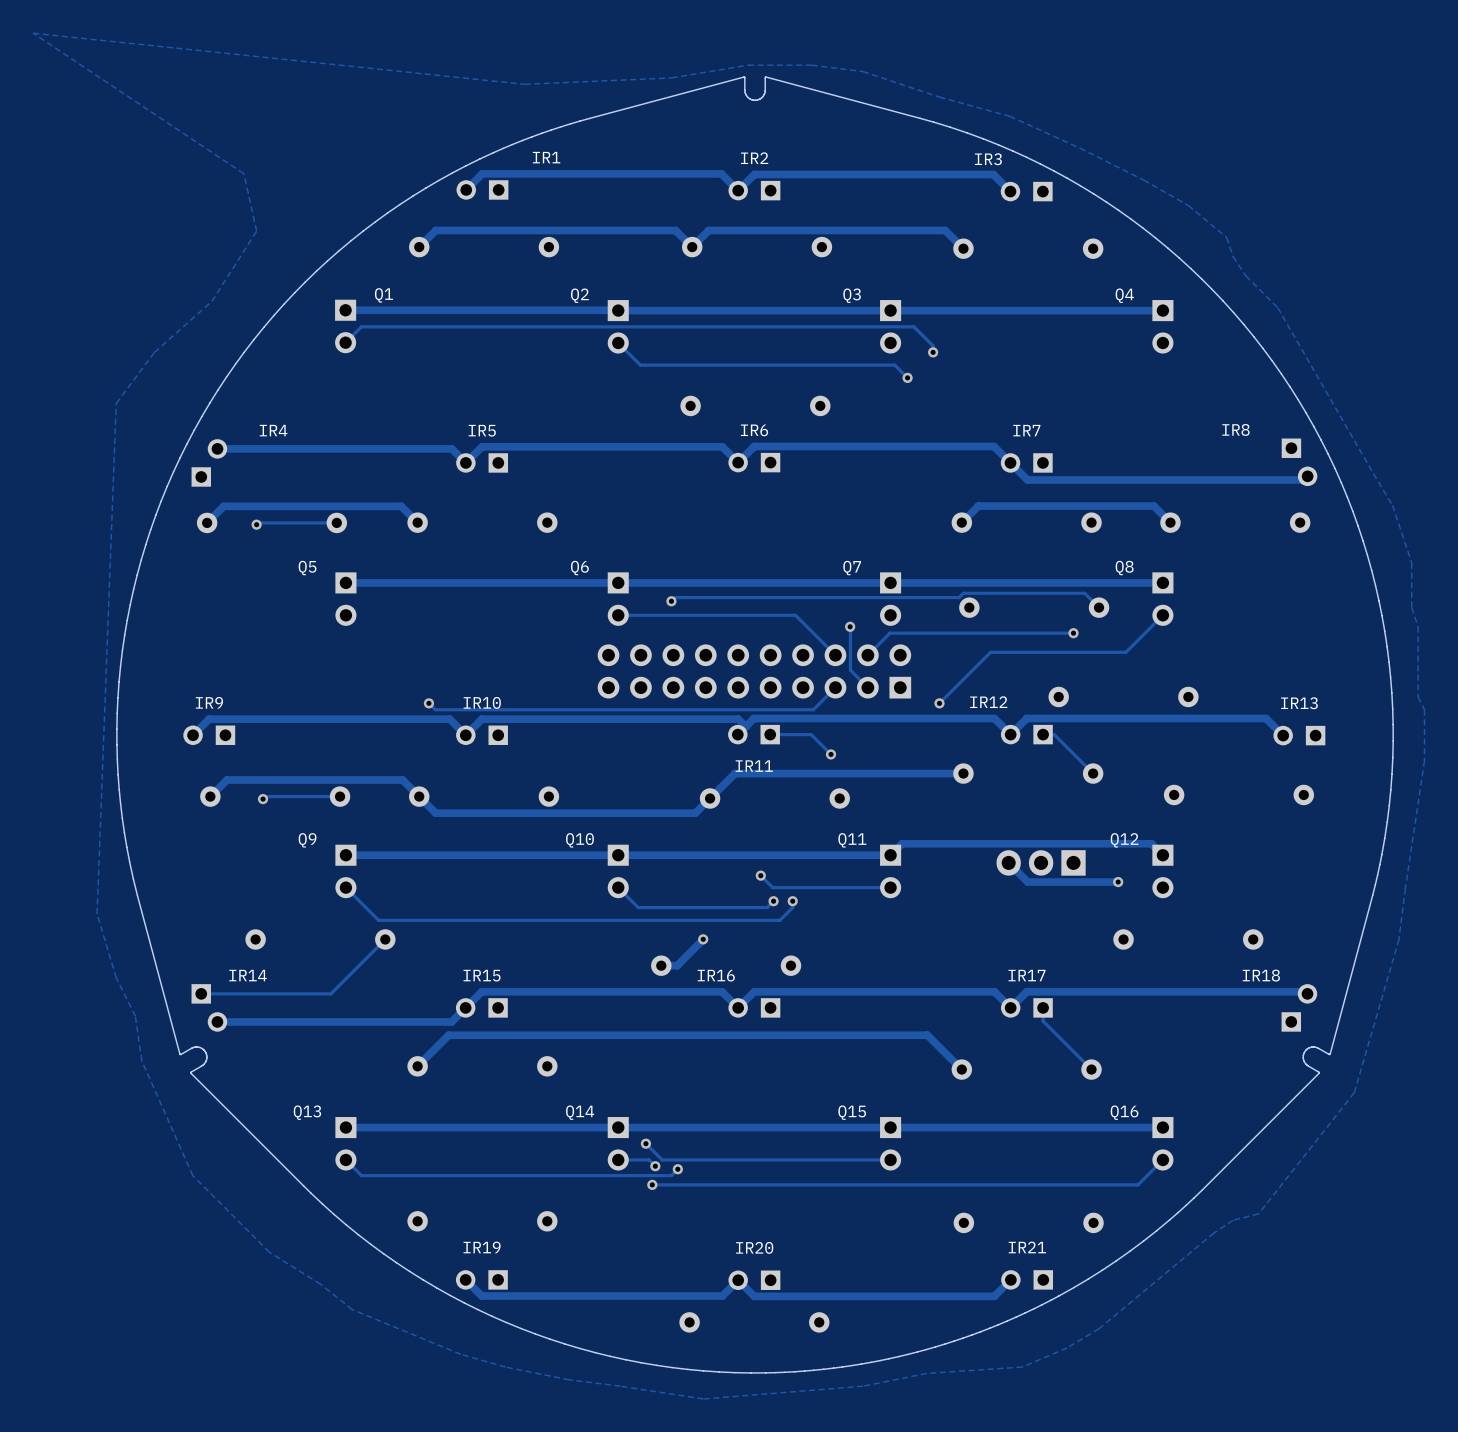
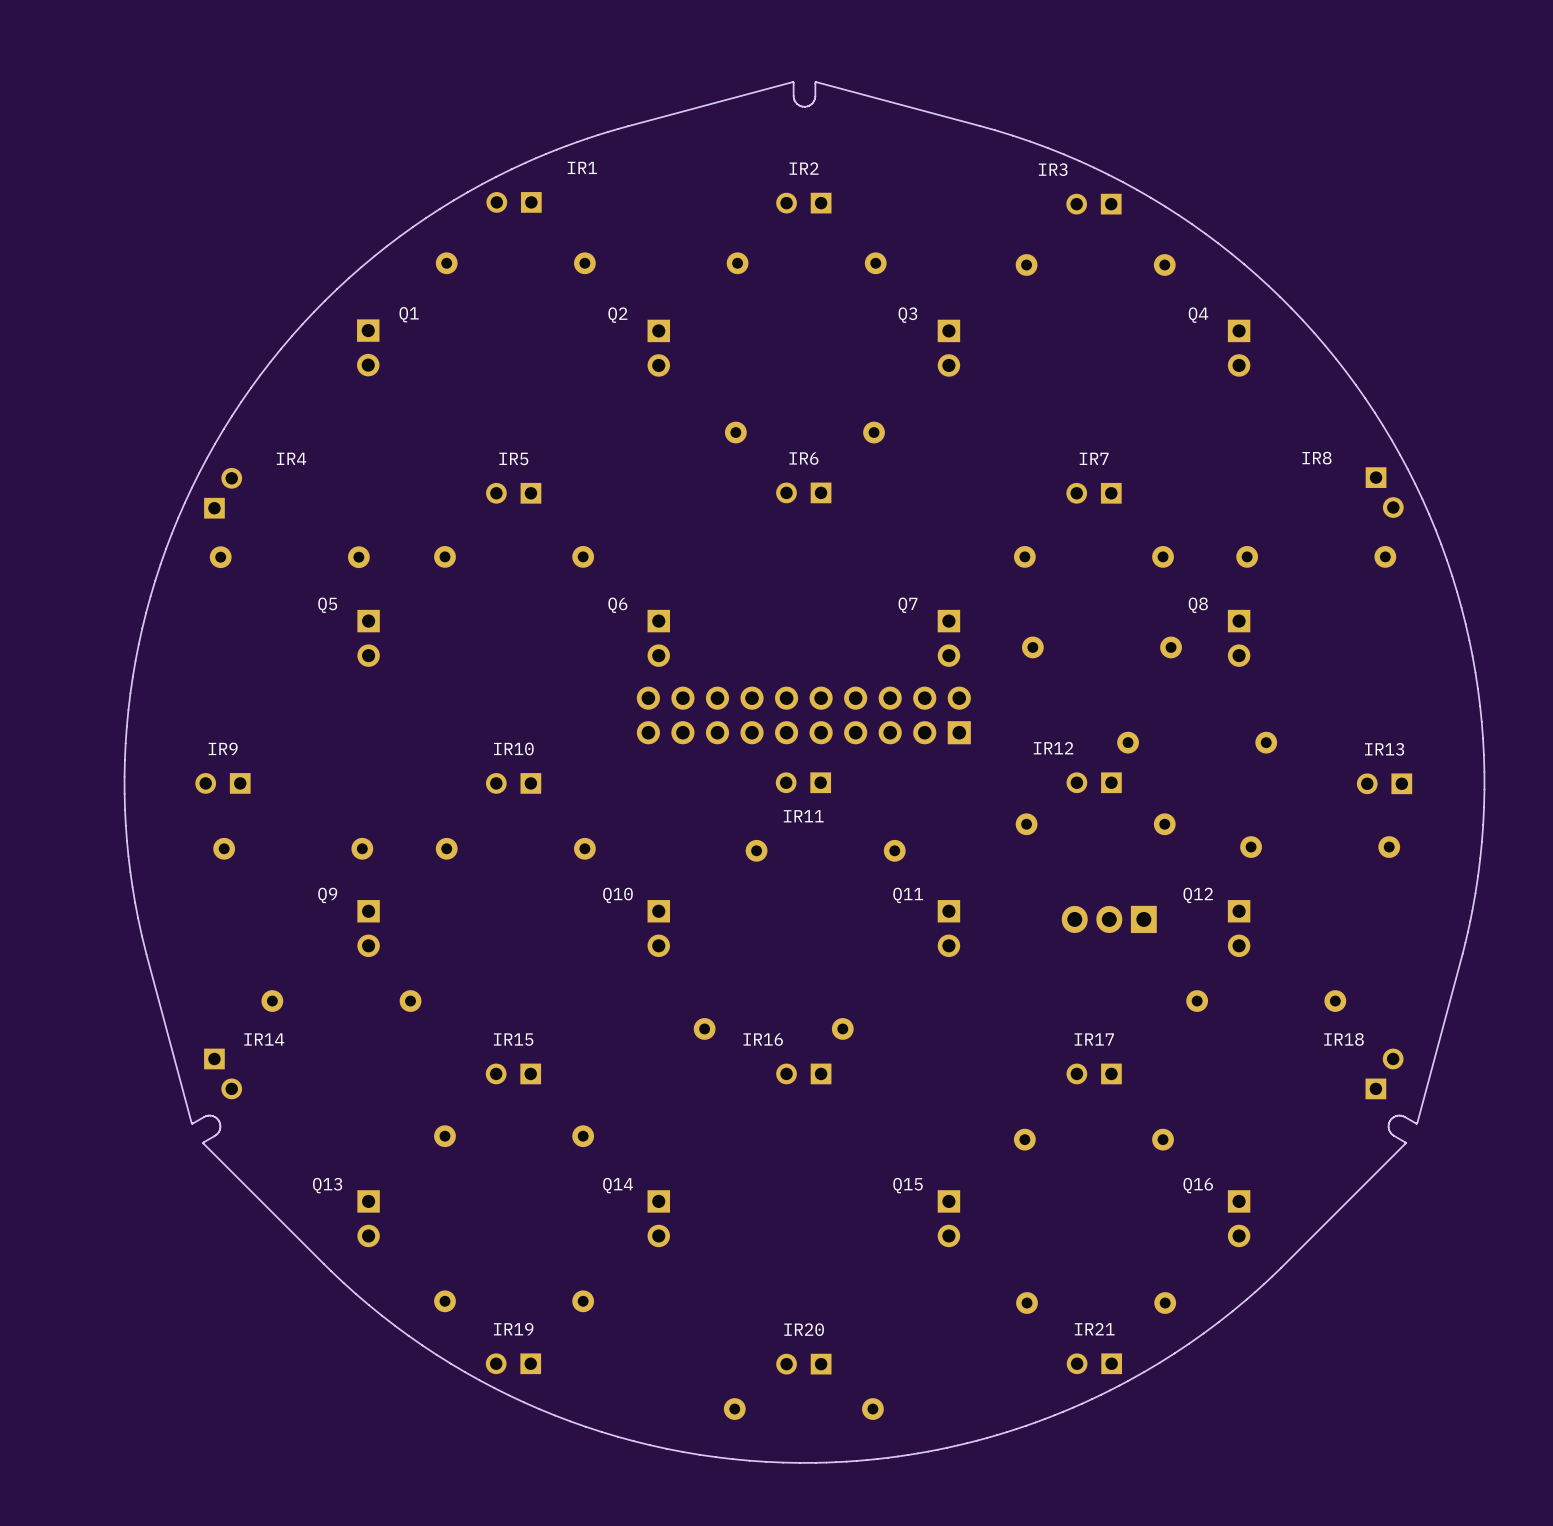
zone outline: (33, 33) (524, 84) (671, 77) (748, 65) (811, 65) (862, 71) (939, 97) (1009, 116) (1079, 148) (1143, 180) (1188, 205) (1226, 237) (1233, 256) (1245, 275) (1277, 307) (1392, 505) (1411, 562) (1411, 607) (1418, 626) (1418, 696) (1424, 709) (1424, 760) (1398, 939) (1354, 1092) (1258, 1213) (1233, 1220) (1213, 1233) (1099, 1328) (1067, 1347) (1022, 1367) (926, 1373) (862, 1386) (703, 1398) (569, 1379) (505, 1367) (460, 1354) (352, 1309) (320, 1284) (269, 1252) (192, 1175) (141, 1060) (135, 1016) (116, 977) (97, 913) (116, 403) (154, 352) (211, 301) (256, 231) (243, 173) (33, 33) -> none
track: (466, 189) (482, 173) (721, 173) (738, 190) (754, 174) (993, 174) (1010, 191) -> none
track: (419, 247) (435, 230) (675, 230) (692, 247) (708, 230) (945, 230) (963, 248) -> none
track: (1162, 310) (345, 310) (345, 314) -> none
track: (345, 342) (361, 326) (913, 326) (933, 345) (933, 352) -> none
track: (618, 343) (640, 365) (894, 365) (907, 377) -> none
via: (933, 352) -> none
via: (907, 377) -> none
track: (217, 448) (451, 448) (465, 462) (481, 446) (722, 446) (738, 462) (754, 446) (994, 446) (1027, 480) (1303, 480) (1307, 476) -> none
track: (336, 522) (258, 522) (256, 524) -> none
track: (417, 522) (401, 506) (223, 506) (207, 522) -> none
track: (961, 522) (978, 506) (1153, 506) (1170, 522) -> none
via: (256, 524) -> none
track: (345, 582) (1162, 582) -> none
track: (671, 601) (675, 597) (959, 597) (963, 593) (1084, 593) (1099, 607) -> none
via: (671, 601) -> none
track: (618, 615) (795, 615) (835, 655) -> none
track: (1162, 615) (1125, 652) (990, 652) (939, 703) -> none
track: (850, 626) (850, 670) (867, 687) -> none
via: (850, 626) -> none
track: (1073, 633) (889, 633) (867, 655) -> none
via: (1073, 633) -> none
track: (835, 687) (813, 709) (435, 709) (428, 703) -> none
via: (428, 703) -> none
via: (939, 703) -> none
track: (745, 726) (738, 719) (481, 719) (465, 735) (449, 719) (209, 719) (193, 735) -> none
track: (737, 734) (753, 718) (994, 718) (1010, 734) (1026, 718) (1266, 718) (1283, 735) -> none
track: (770, 734) (811, 734) (831, 754) -> none
track: (1043, 734) (1054, 734) (1093, 773) -> none
via: (831, 754) -> none
track: (963, 773) (734, 773) (695, 813) (435, 813) (402, 780) (226, 780) (210, 796) -> none
track: (340, 796) (265, 796) (263, 799) -> none
via: (263, 799) -> none
track: (345, 855) (890, 855) (902, 843) (1151, 843) (1162, 855) -> none
track: (1008, 862) (1027, 882) (1118, 882) -> none
track: (760, 875) (772, 887) (890, 887) -> none
via: (760, 875) -> none
via: (1118, 882) -> none
track: (345, 887) (378, 920) (779, 920) (792, 907) (792, 901) -> none
track: (618, 887) (638, 907) (767, 907) (773, 901) -> none
via: (773, 901) -> none
via: (792, 901) -> none
track: (385, 939) (330, 993) (201, 993) -> none
track: (703, 939) (677, 965) (661, 965) -> none
via: (703, 939) -> none
track: (1307, 993) (1305, 991) (1026, 991) (1010, 1007) (994, 991) (754, 991) (738, 1007) (722, 991) (481, 991) (451, 1021) (217, 1021) -> none
track: (1043, 1007) (1043, 1021) (1091, 1069) -> none
track: (417, 1066) (448, 1035) (927, 1035) (961, 1069) -> none
track: (345, 1127) (1162, 1127) -> none
track: (645, 1143) (662, 1159) (890, 1159) -> none
via: (645, 1143) -> none
track: (345, 1159) (361, 1175) (671, 1175) (677, 1169) -> none
track: (618, 1159) (649, 1159) (655, 1166) -> none
track: (1162, 1159) (1138, 1184) (652, 1184) -> none
via: (655, 1166) -> none
via: (677, 1169) -> none
via: (652, 1184) -> none
track: (465, 1279) (481, 1296) (722, 1296) (738, 1280) (754, 1296) (994, 1296) (1010, 1279) -> none

